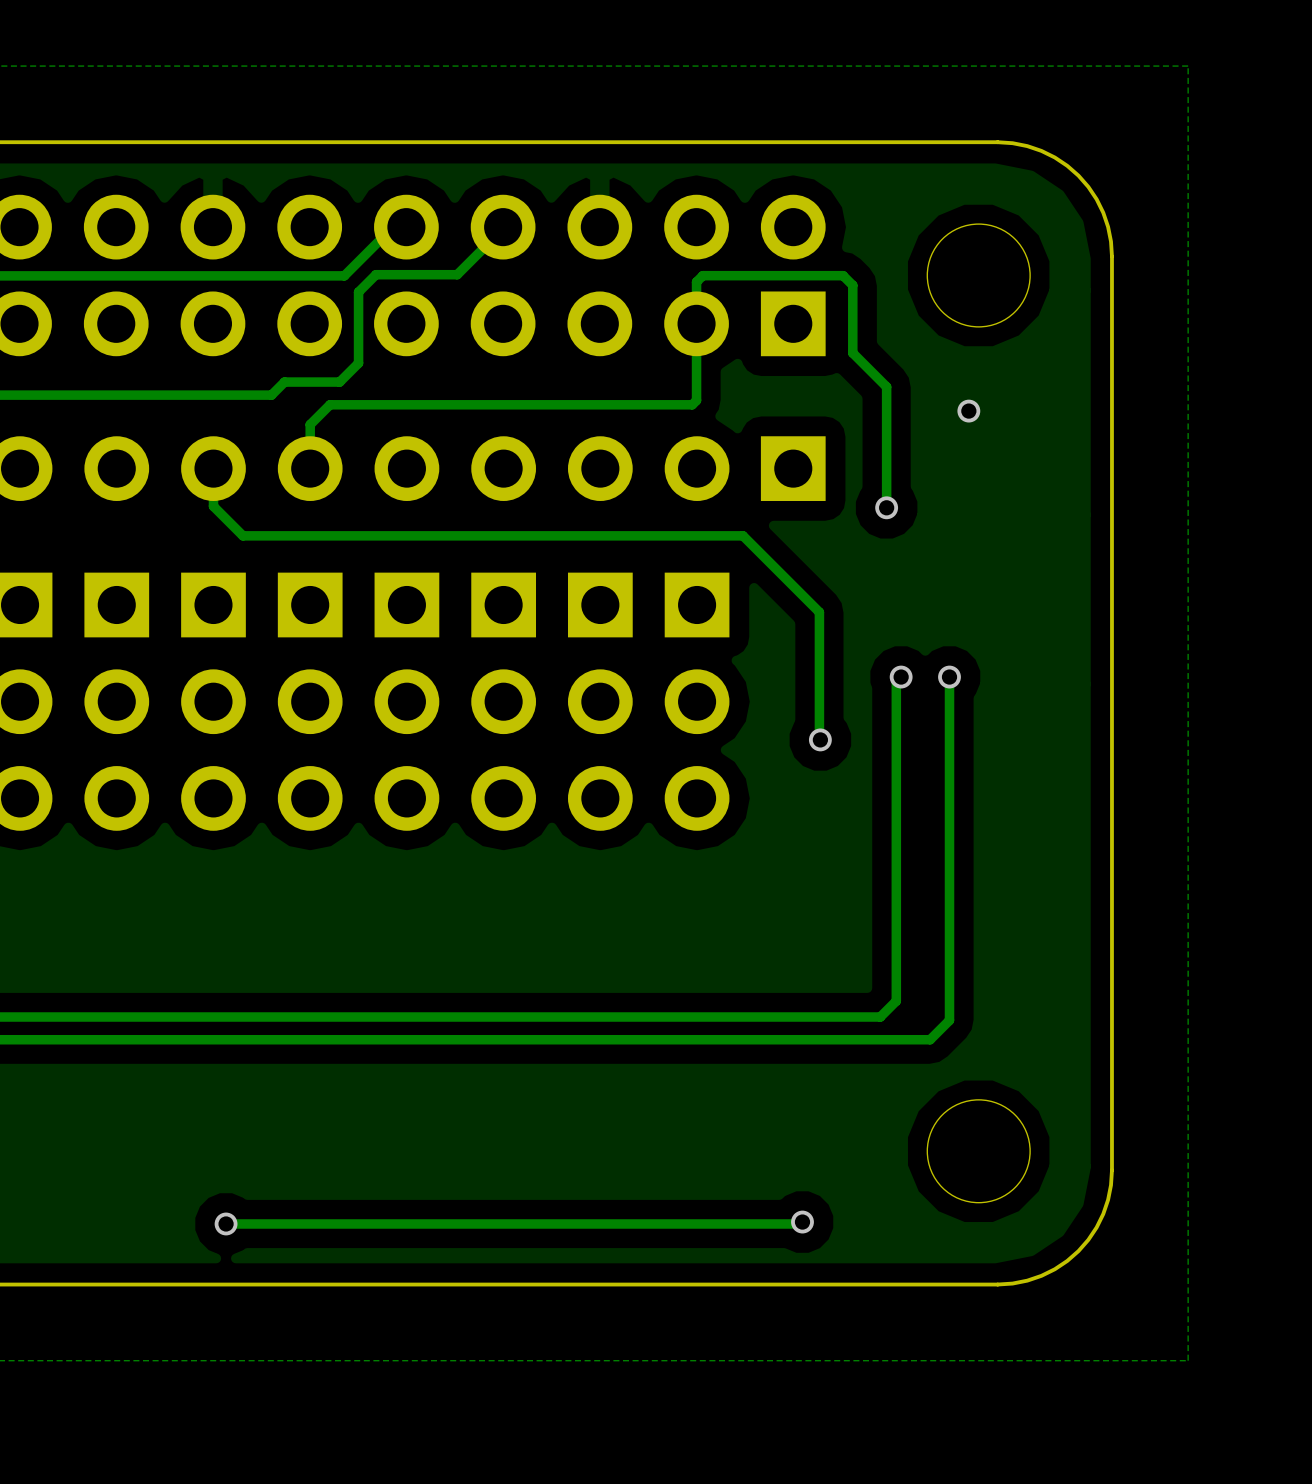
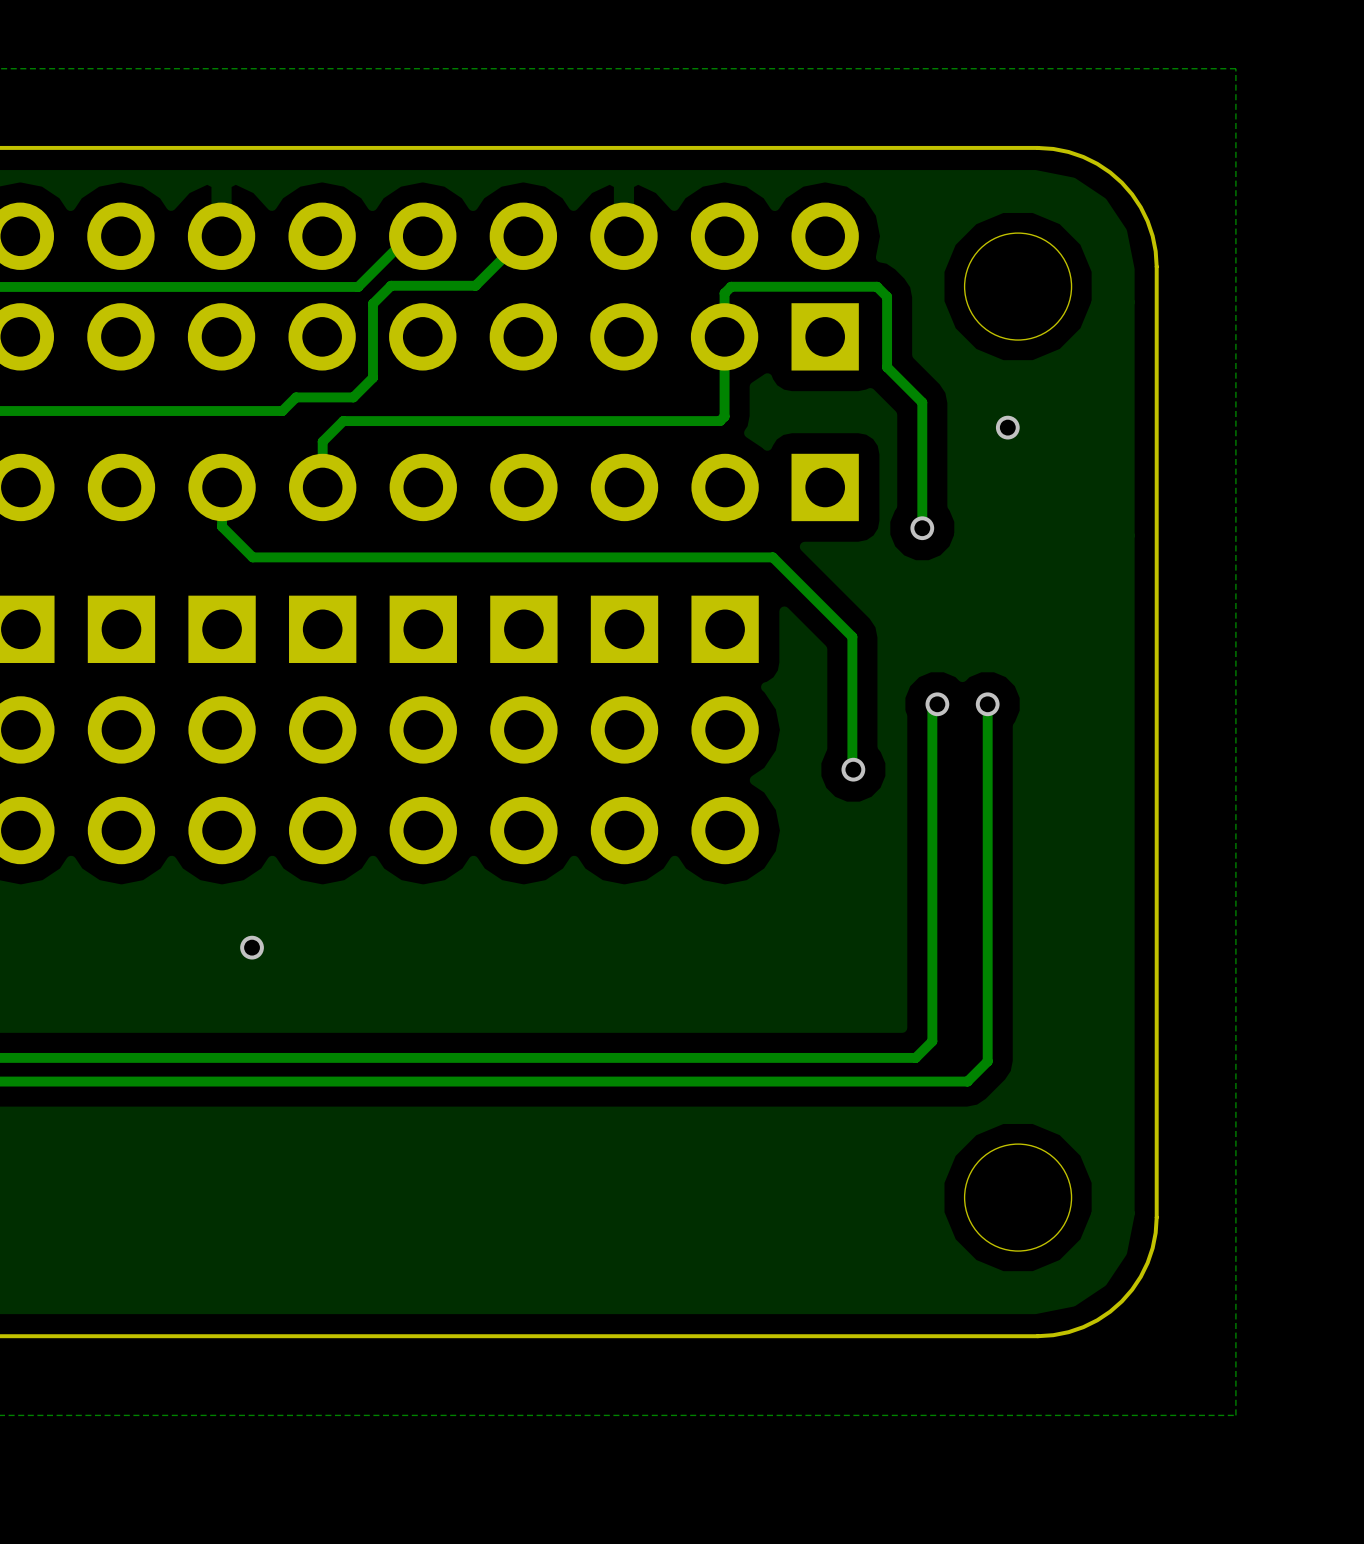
via: none -> (252, 947)
track: (802, 1222) (800, 1223) (226, 1223) -> none
via: (802, 1222) -> none
via: (226, 1223) -> none

